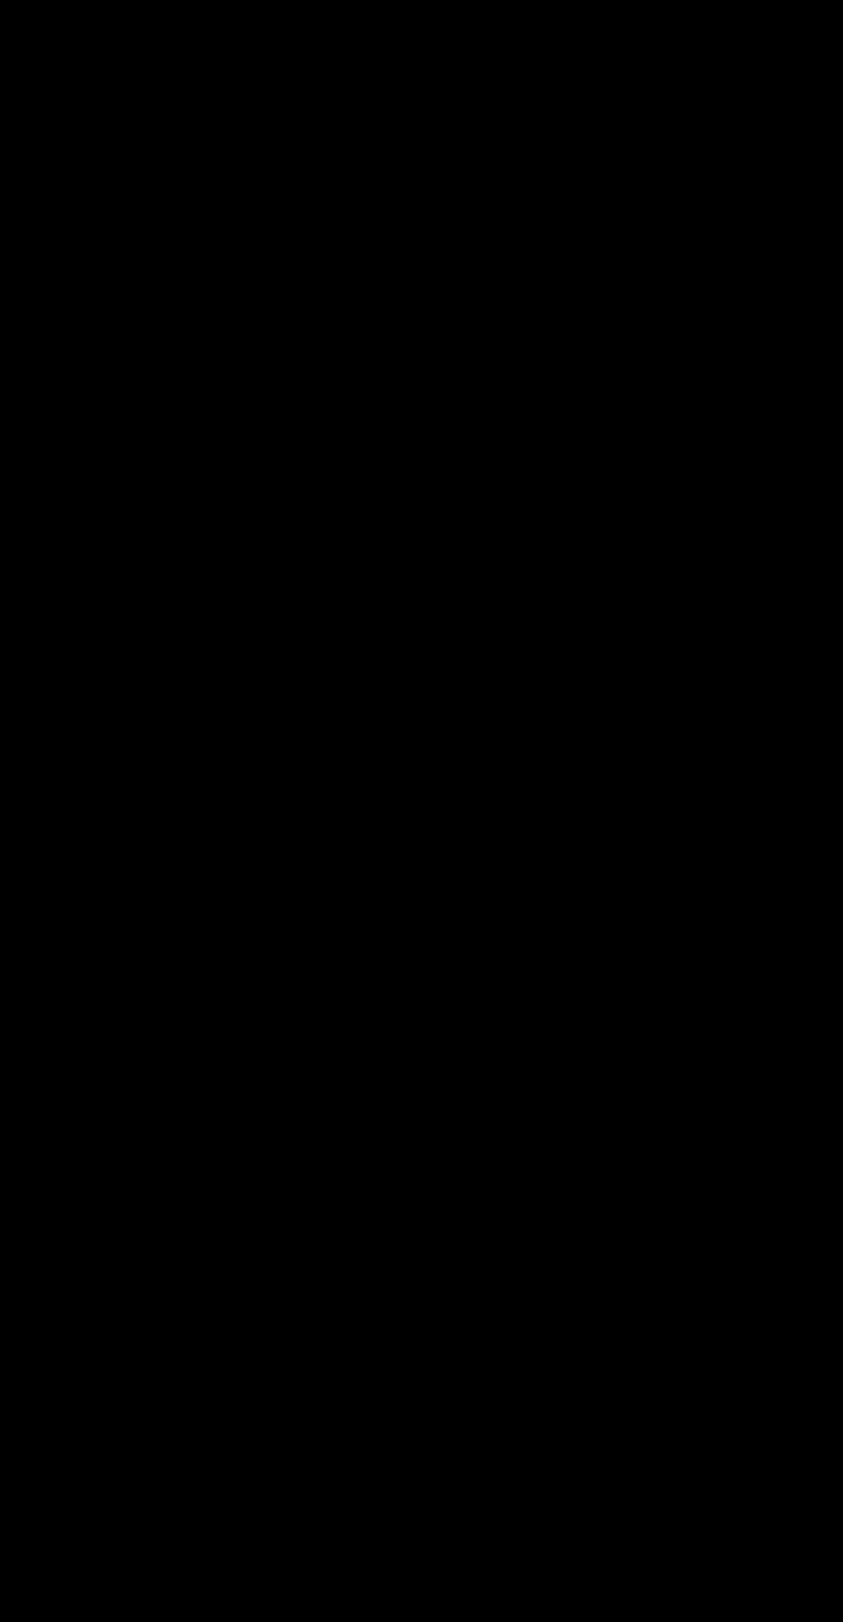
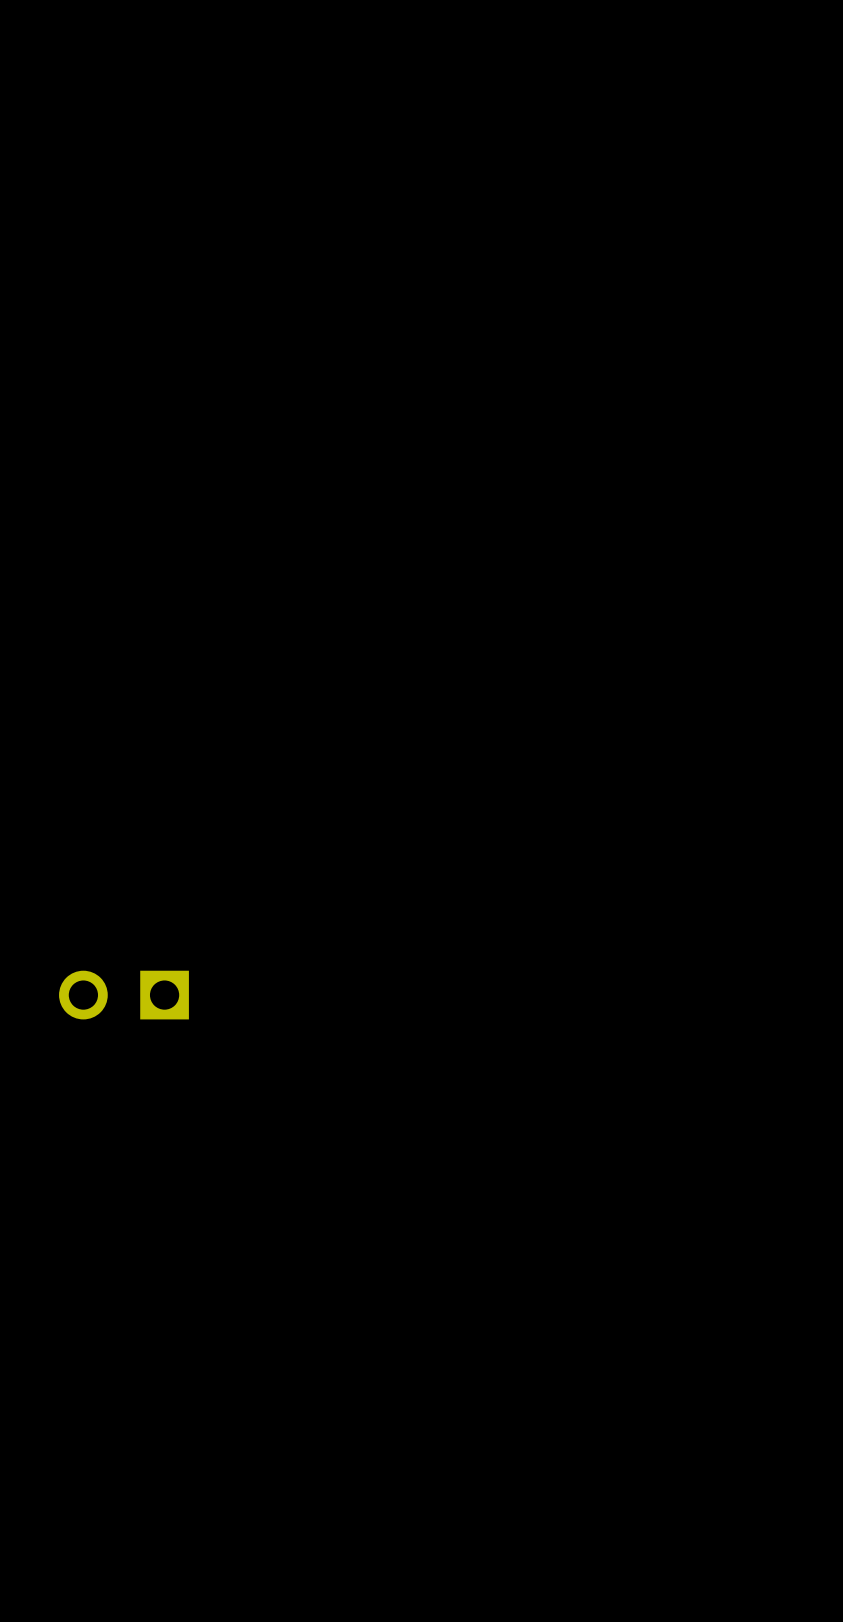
part: none -> (123, 995)

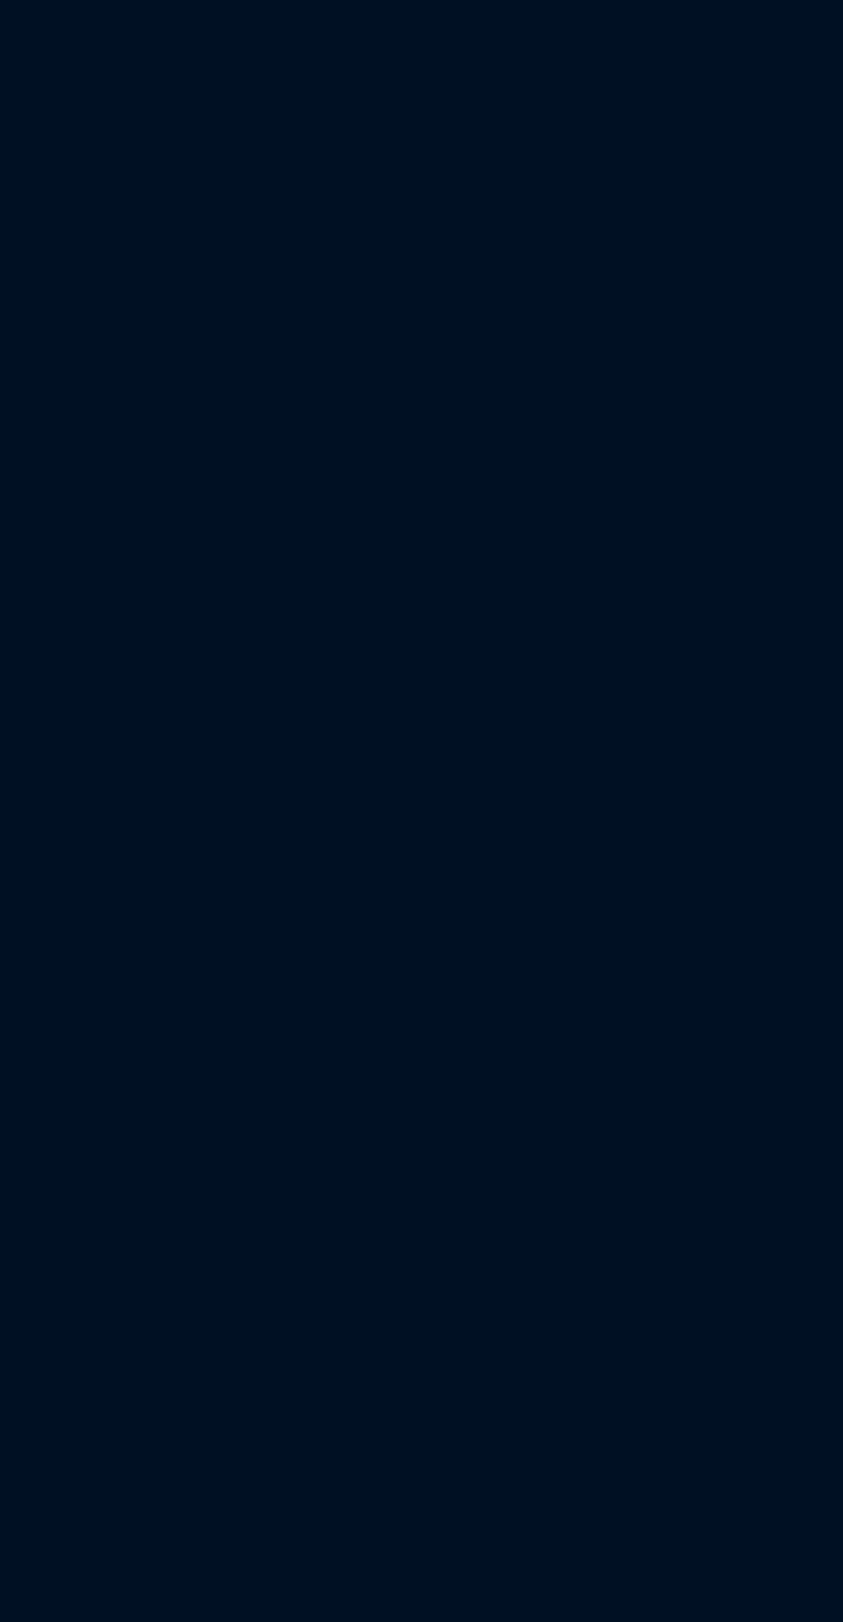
part: (123, 995) -> none

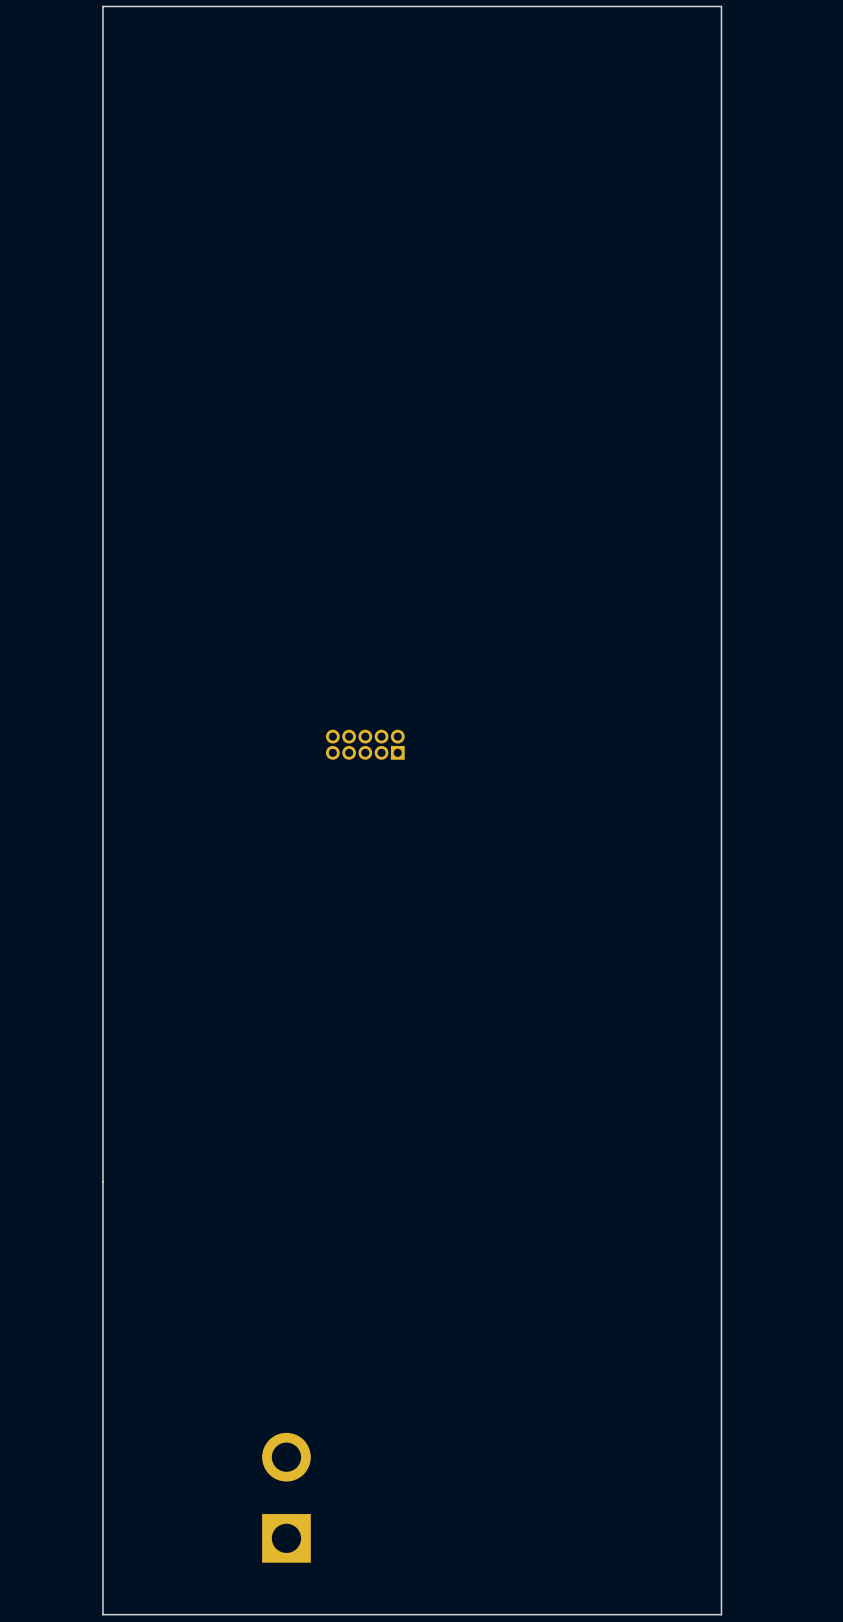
board edge: none -> (721, 6) (721, 1614) (102, 1614) (102, 6) (721, 6)
part: none -> (365, 744)
part: none -> (286, 1497)

